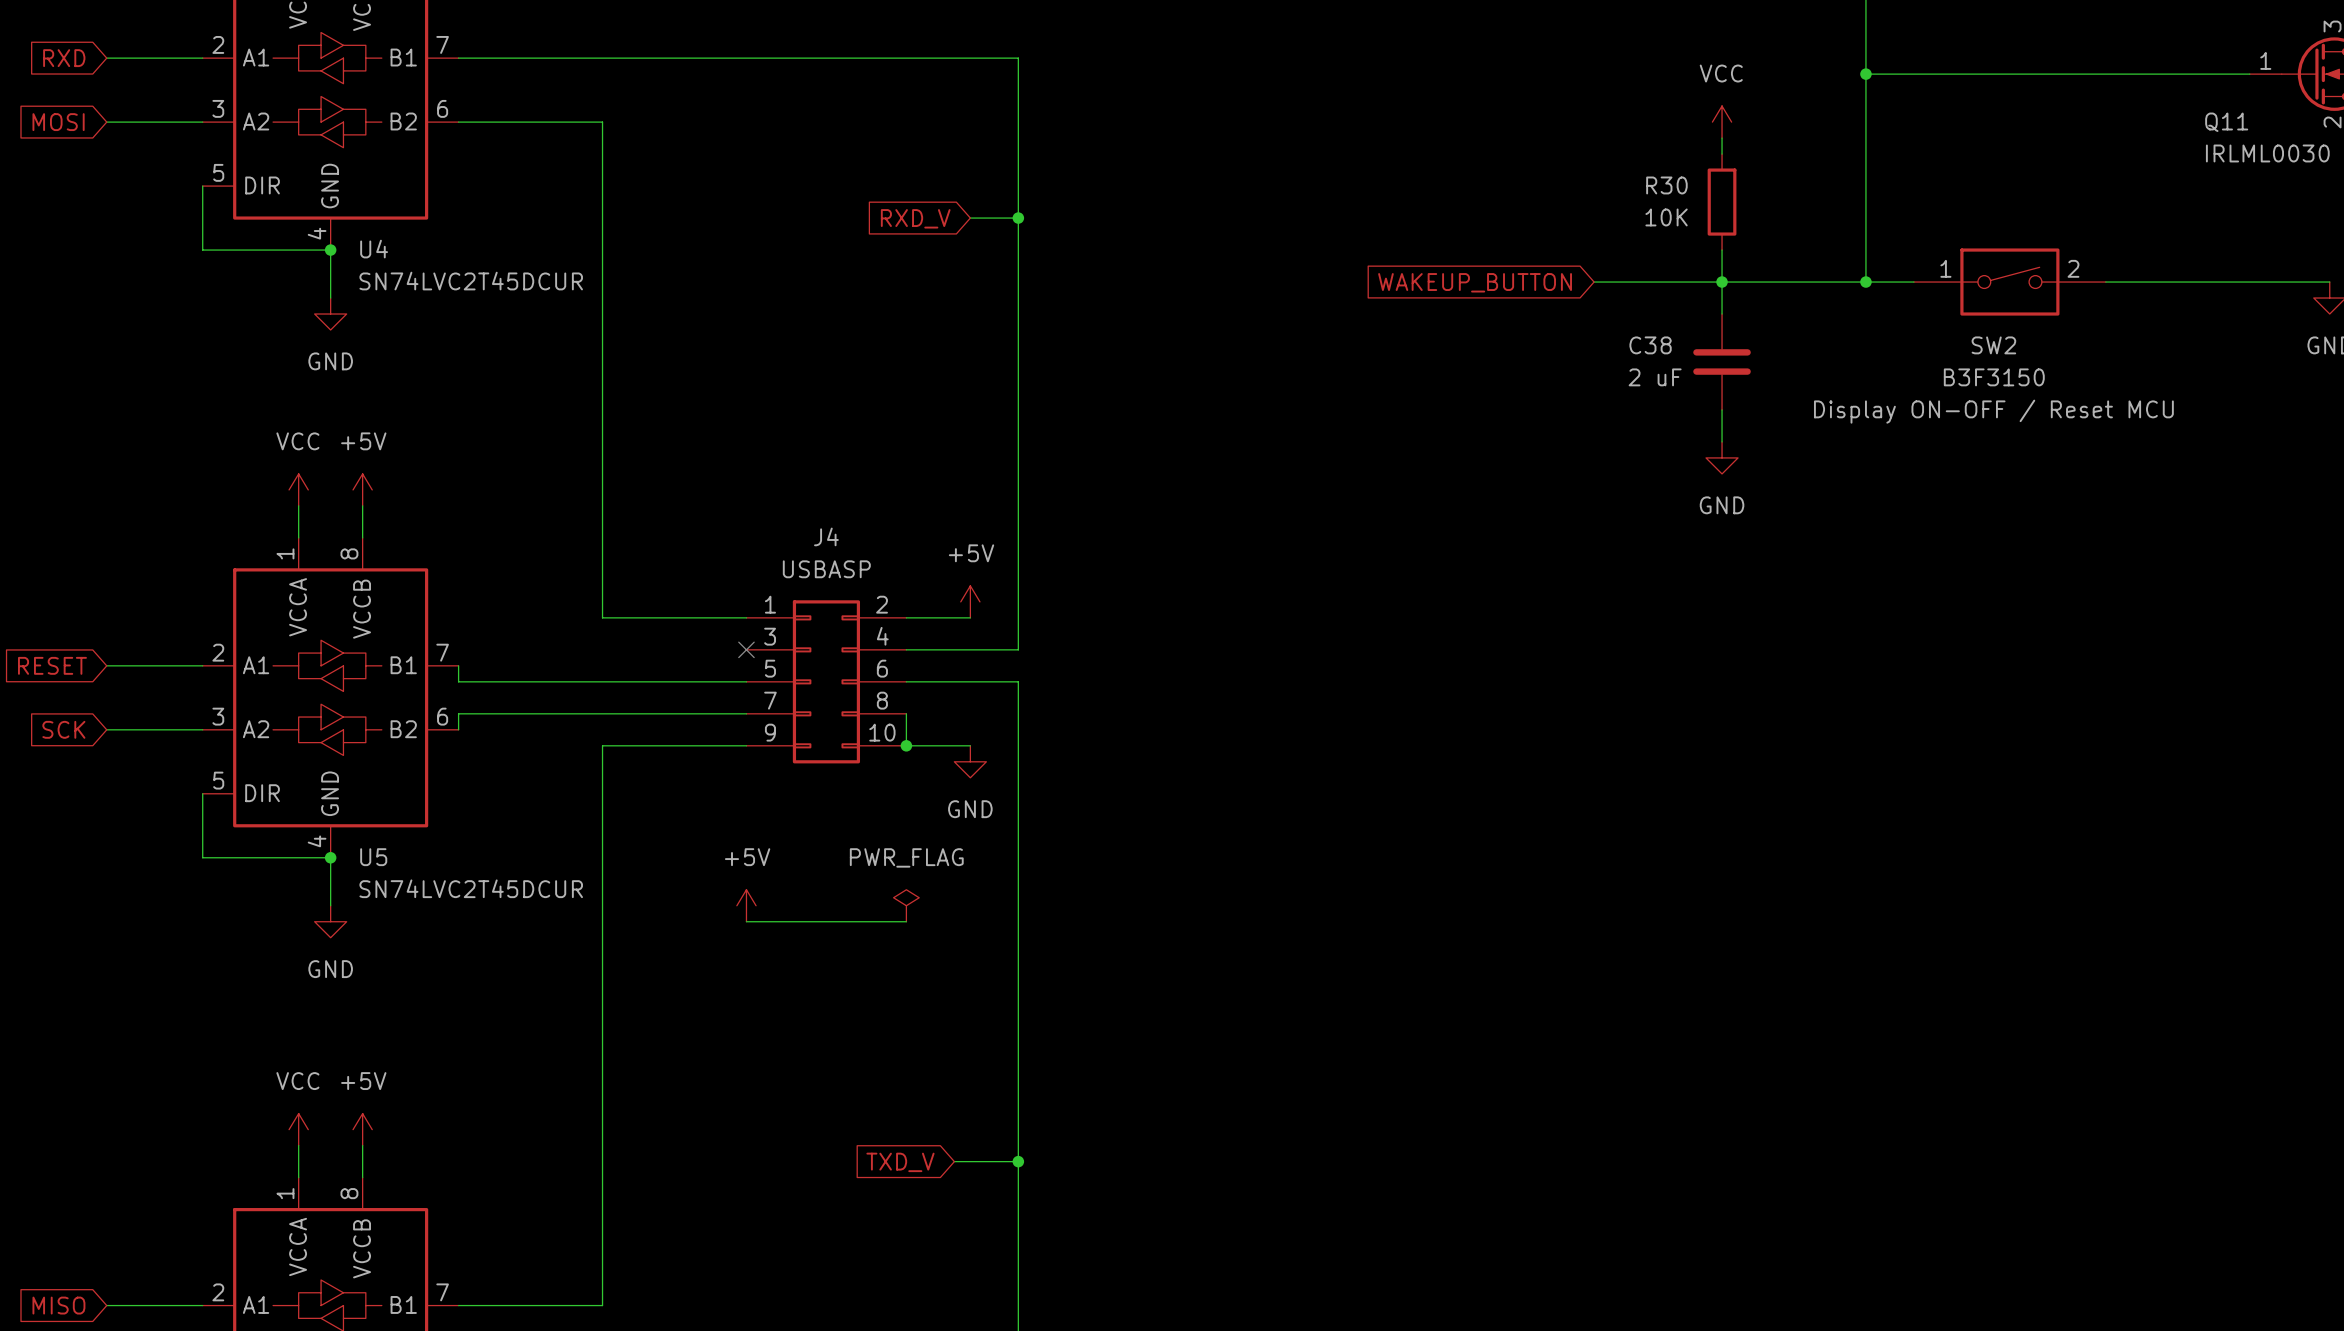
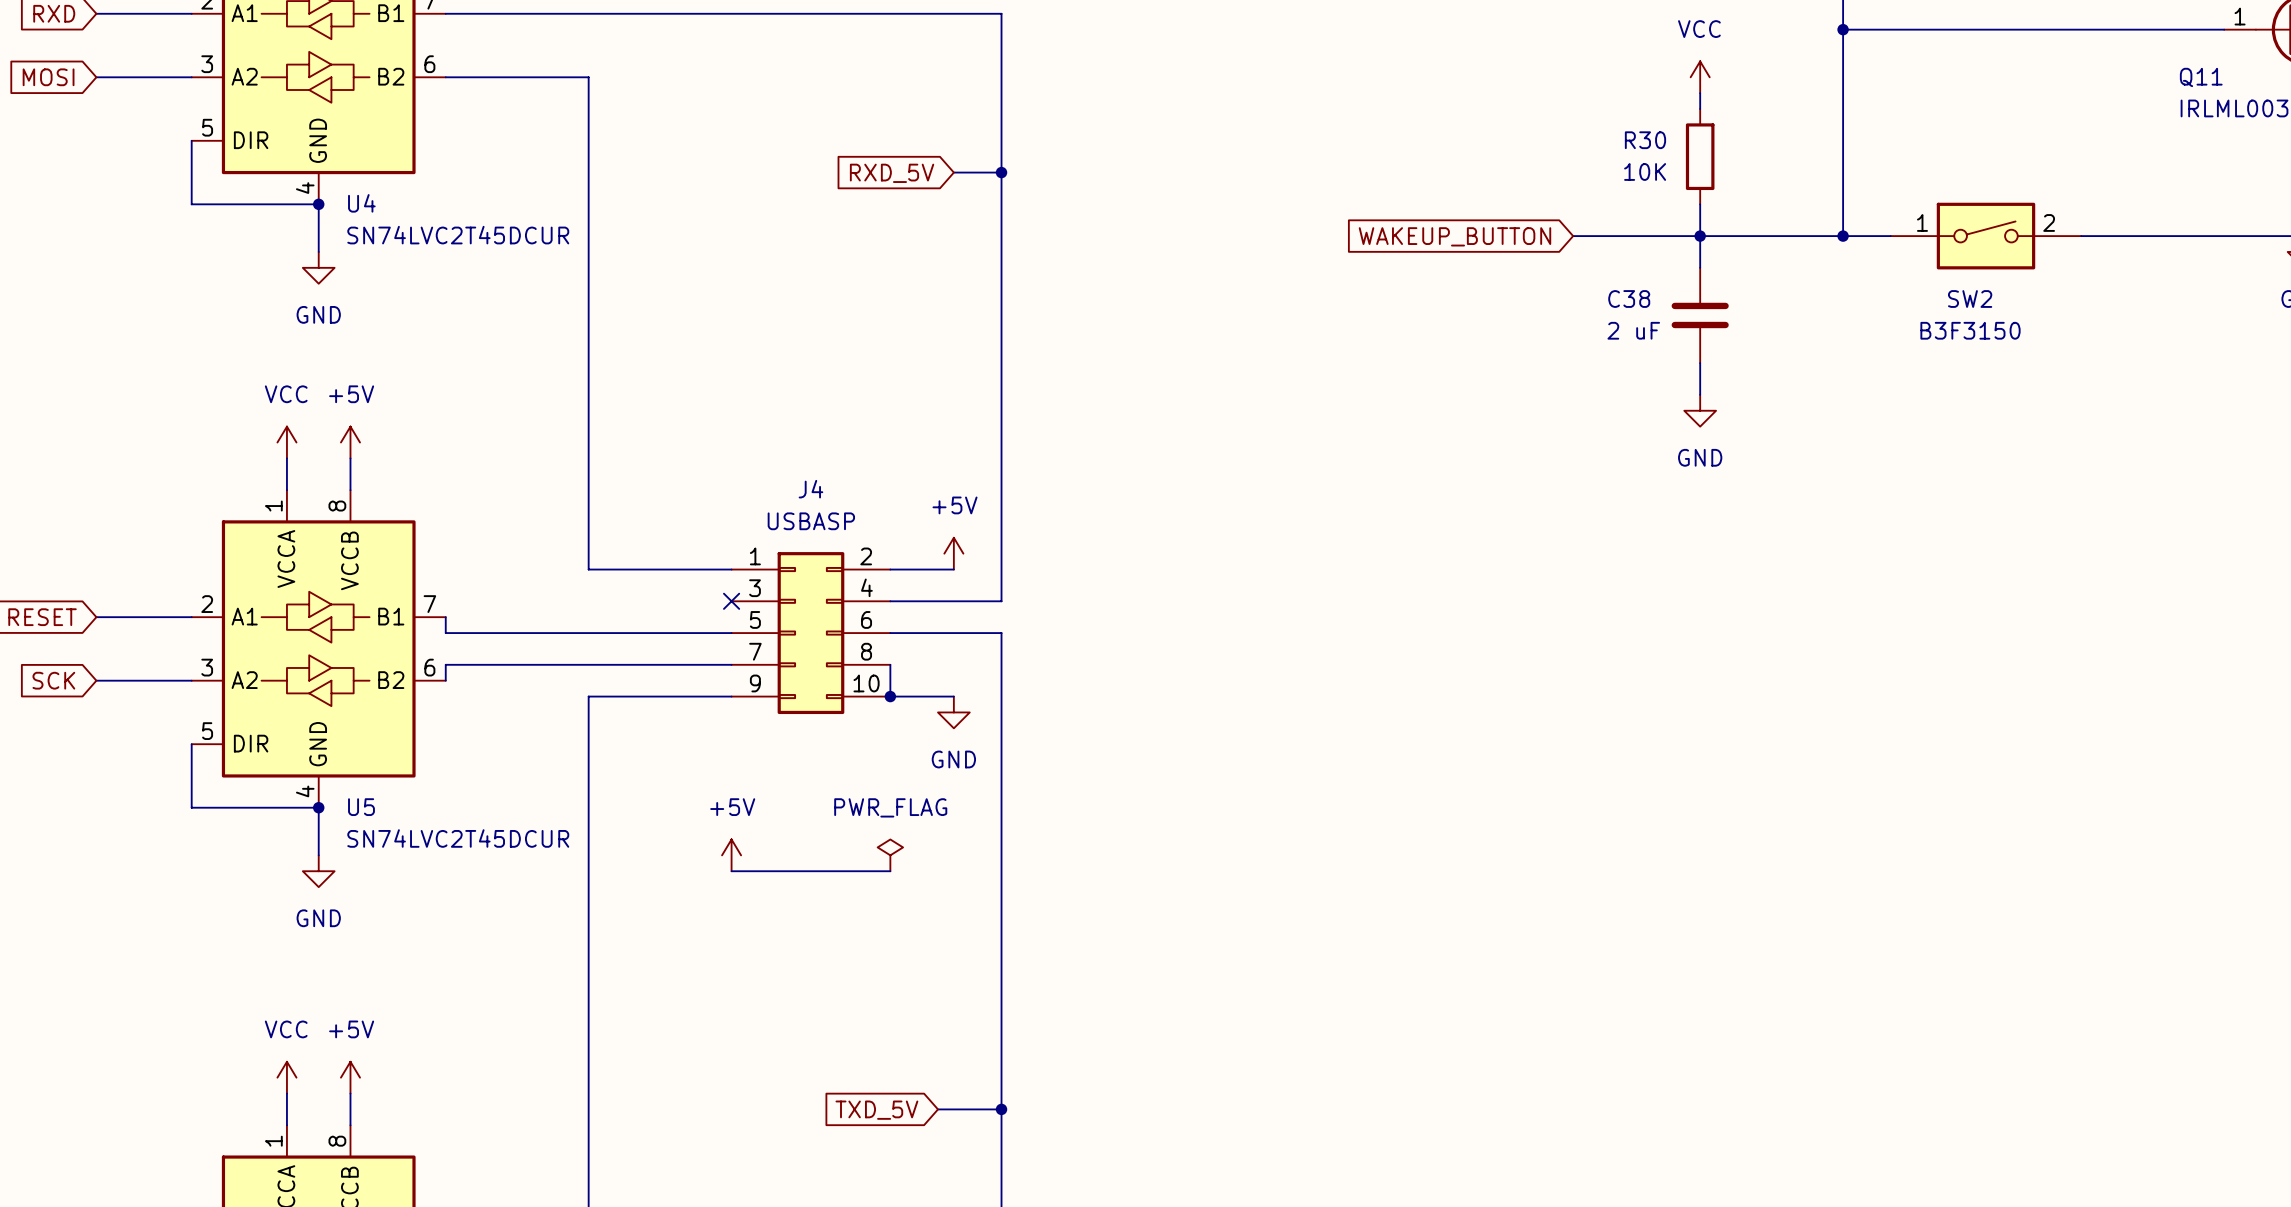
global label: RXD_V (915, 218) -> RXD_5V (892, 173)
SW2 text: Display ON-OFF / Reset MCU (1993, 411) -> none
global label: TXD_V (900, 1162) -> TXD_5V (876, 1110)

